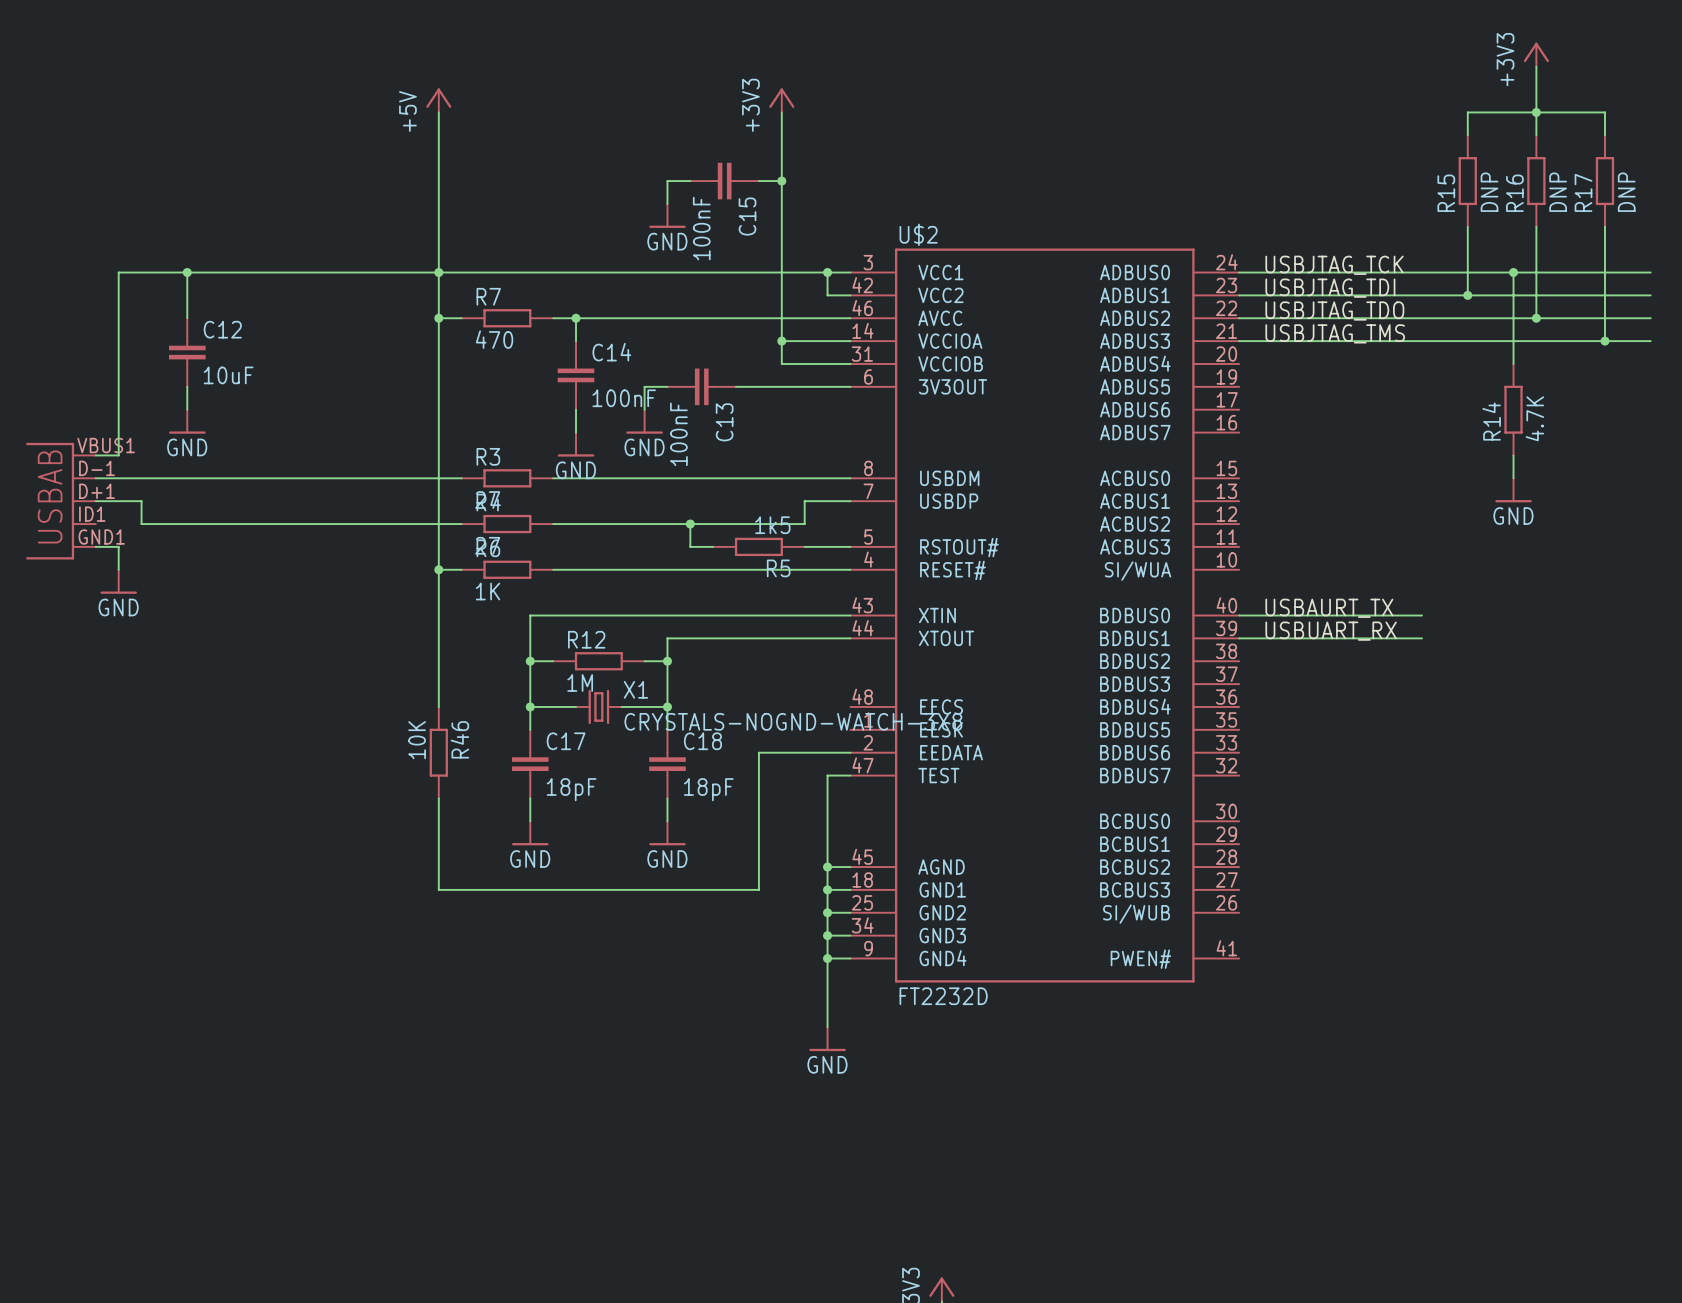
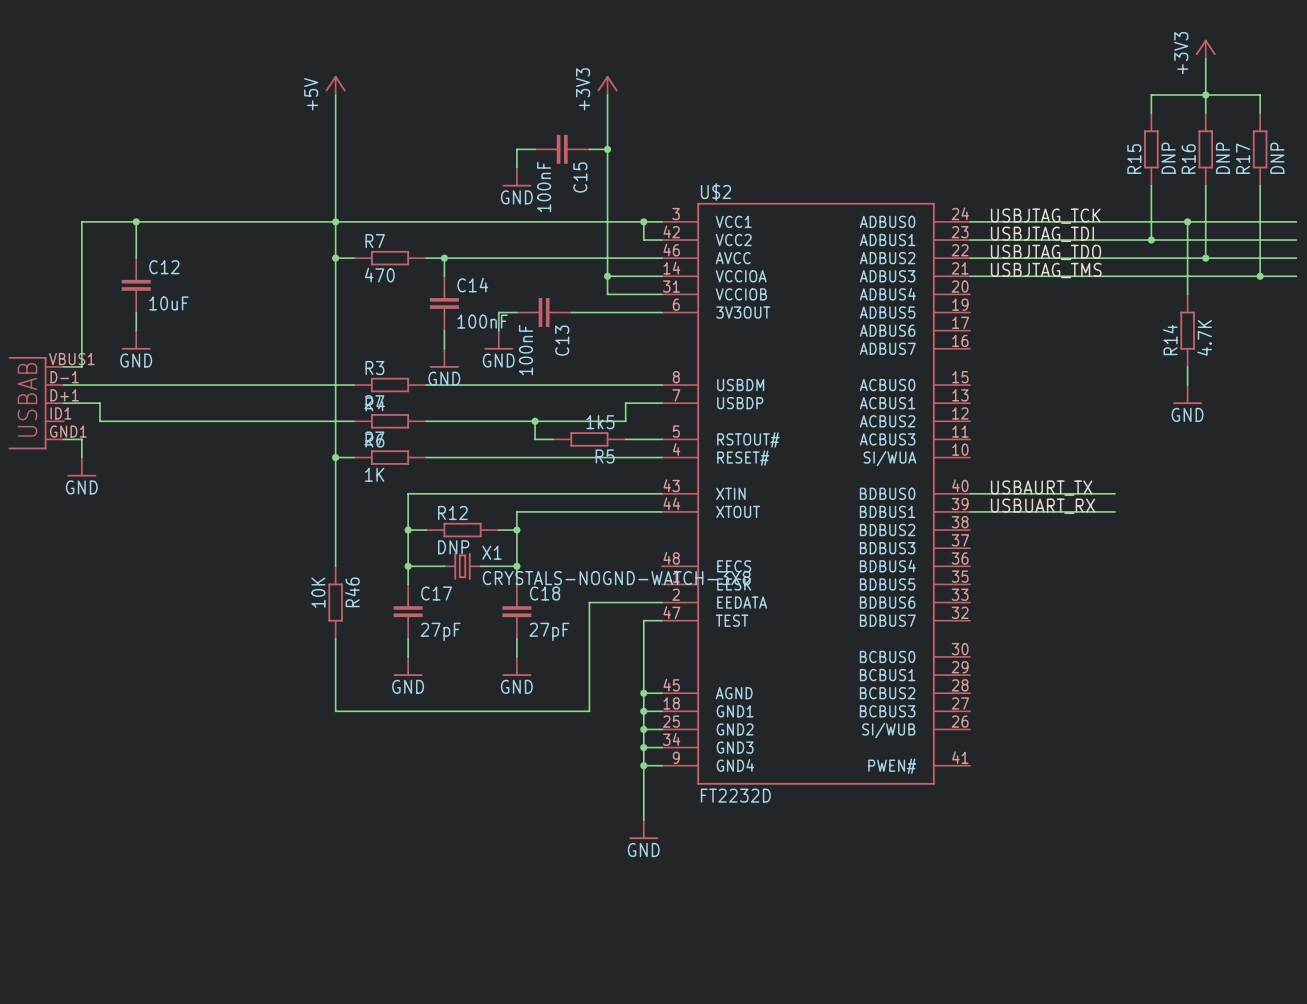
R12 value: 1M (580, 682) -> DNP (453, 547)
C17 value: 18pF (571, 789) -> 27pF (440, 631)
C18 value: 18pF (708, 789) -> 27pF (549, 631)

